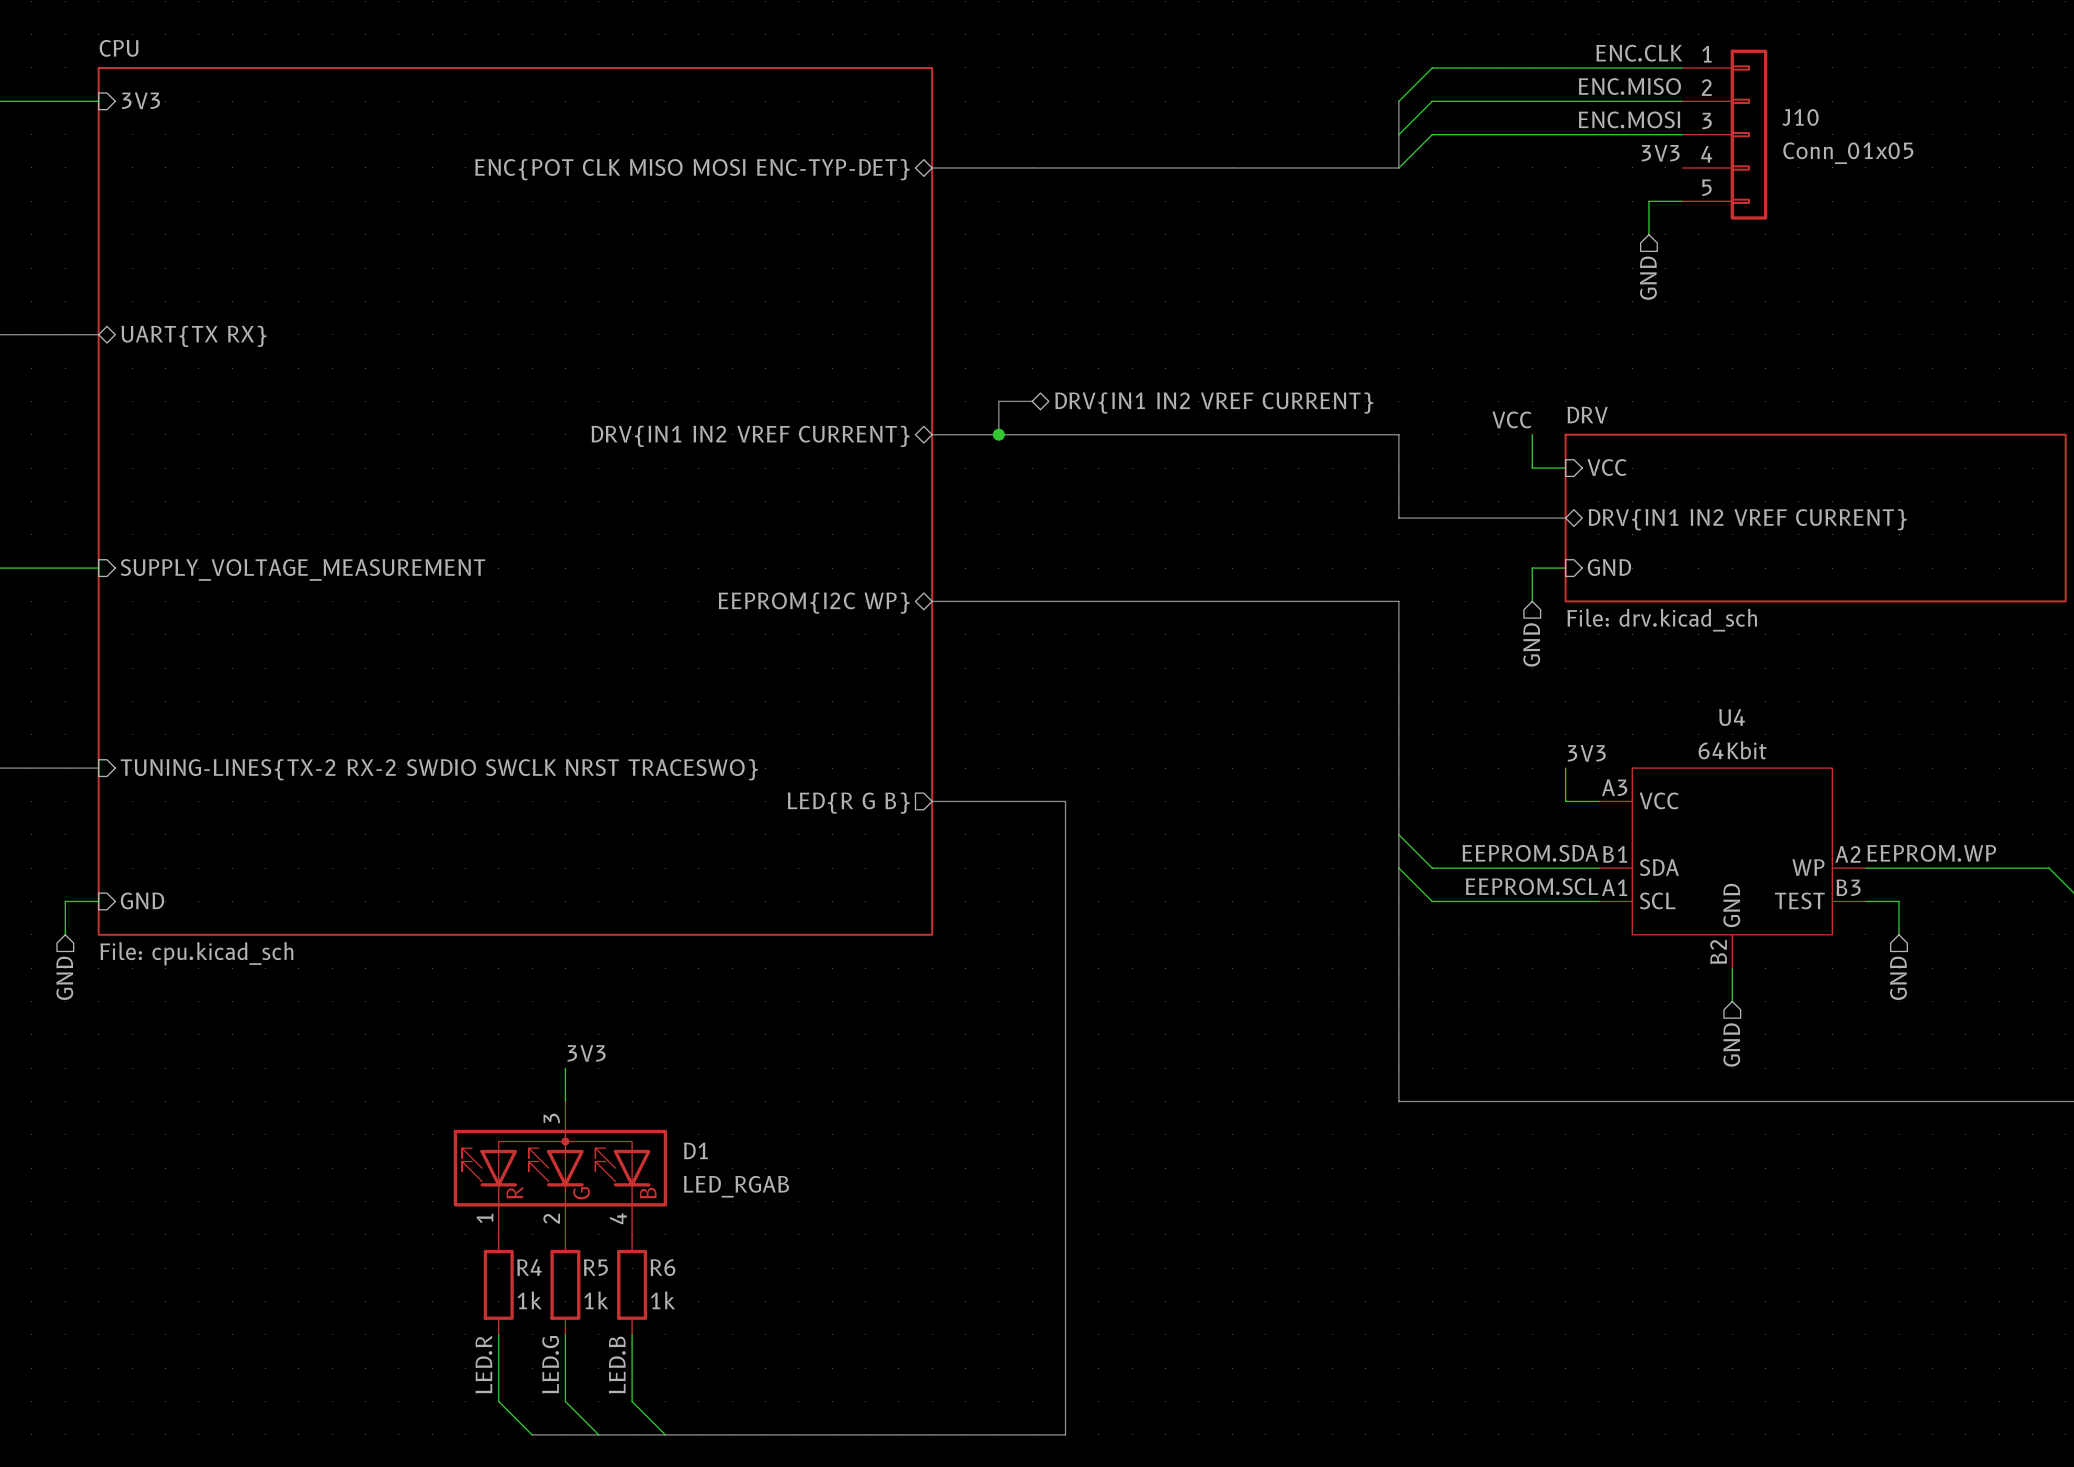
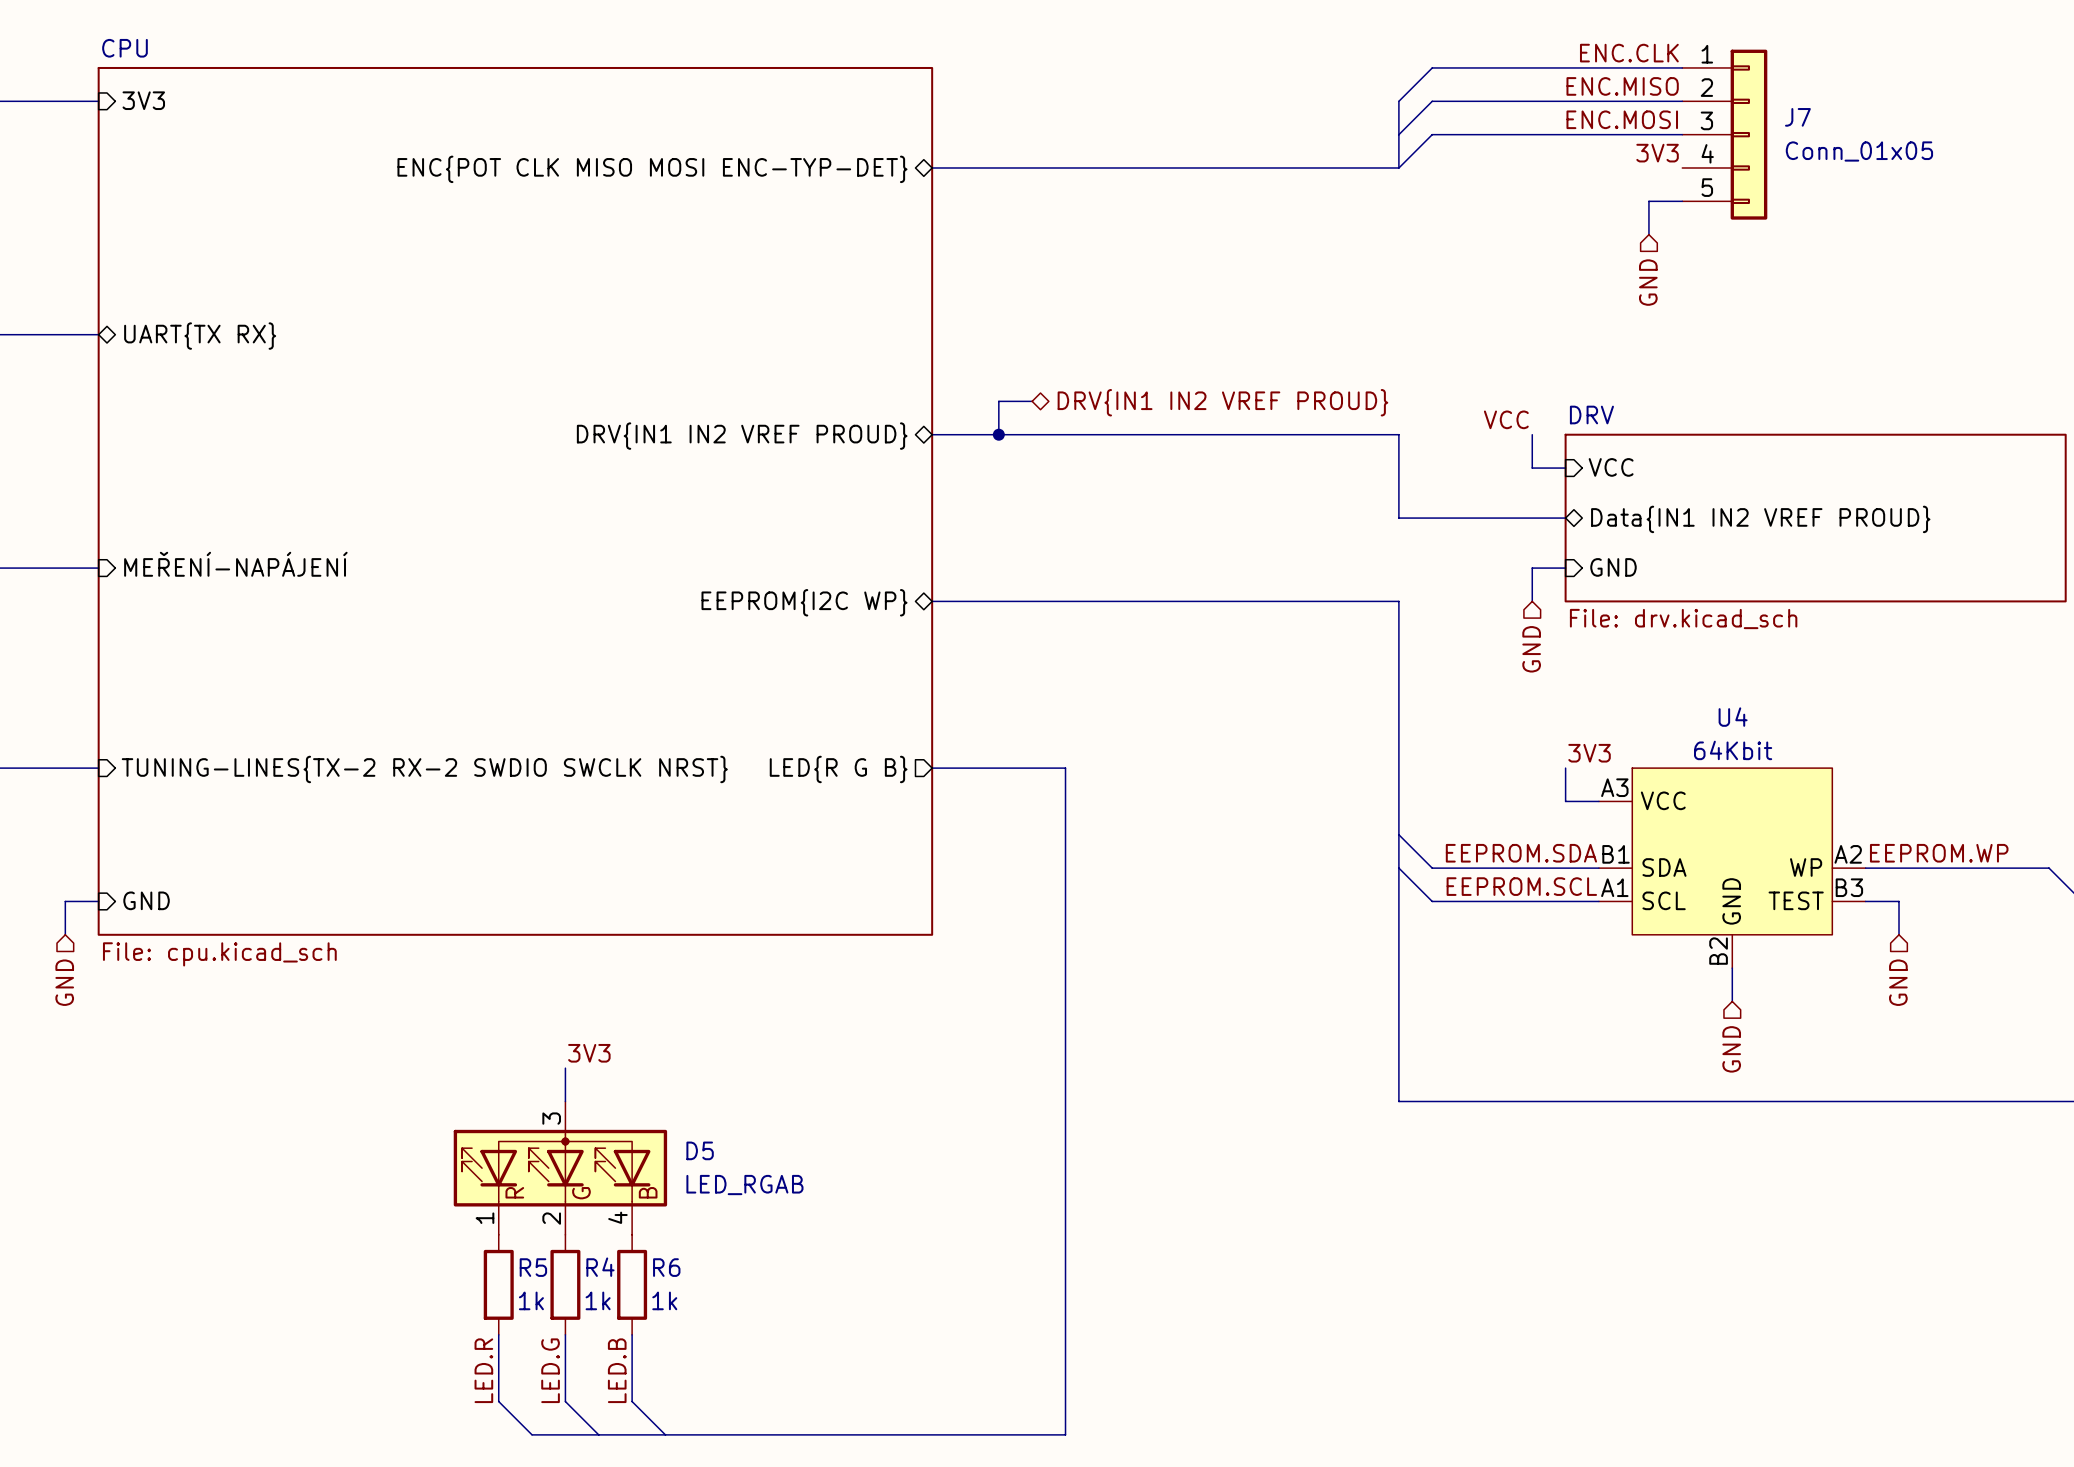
J10 name: J10 (1800, 117) -> J7 (1797, 117)
hierarchical label: DRV{IN1 IN2 VREF CURRENT} (1214, 403) -> DRV{IN1 IN2 VREF PROUD} (1222, 402)
sheet pin: DRV{IN1 IN2 VREF CURRENT} (750, 436) -> DRV{IN1 IN2 VREF PROUD} (742, 436)
sheet pin: DRV{IN1 IN2 VREF CURRENT} (1747, 519) -> Data{IN1 IN2 VREF PROUD} (1760, 519)
sheet pin: SUPPLY_VOLTAGE_MEASUREMENT (302, 569) -> MEŘENÍ-NAPÁJENÍ (235, 564)
sheet pin: TUNING-LINES{TX-2 RX-2 SWDIO SWCLK NRST TRACESWO} (439, 769) -> TUNING-LINES{TX-2 RX-2 SWDIO SWCLK NRST} (424, 769)
bus: (932, 801) (1065, 801) -> (932, 768) (1065, 768) (1065, 801)
sheet pin position: LED{R G B} (848, 803) -> LED{R G B} (838, 769)
D1 name: D1 (695, 1150) -> D5 (700, 1150)
R4 name: R4 (529, 1267) -> R5 (533, 1267)
R5 name: R5 (595, 1267) -> R4 (600, 1267)

